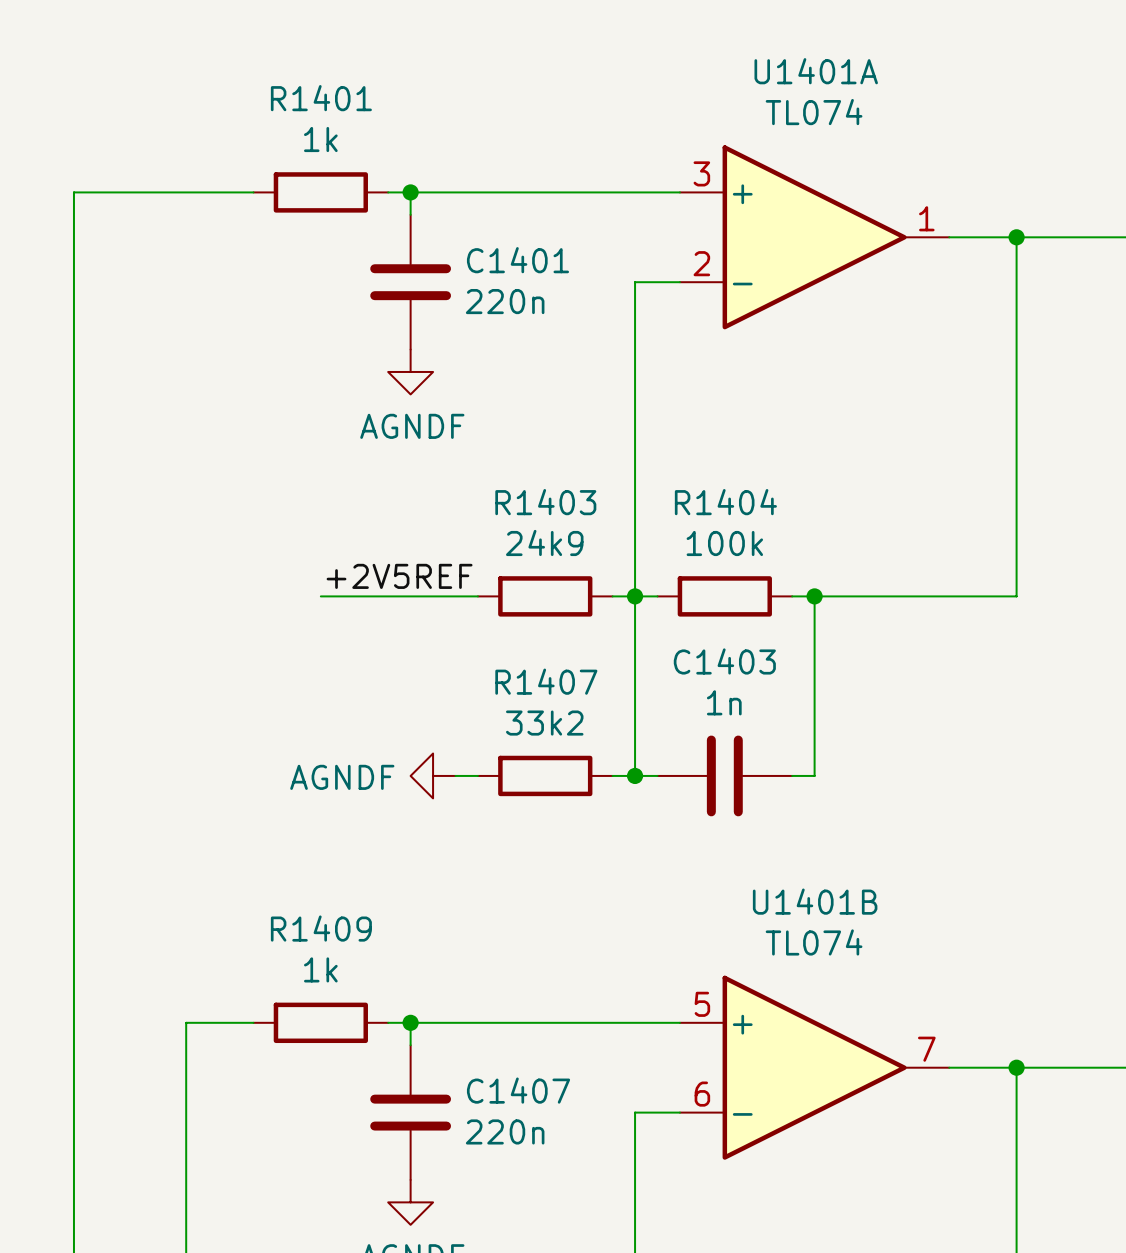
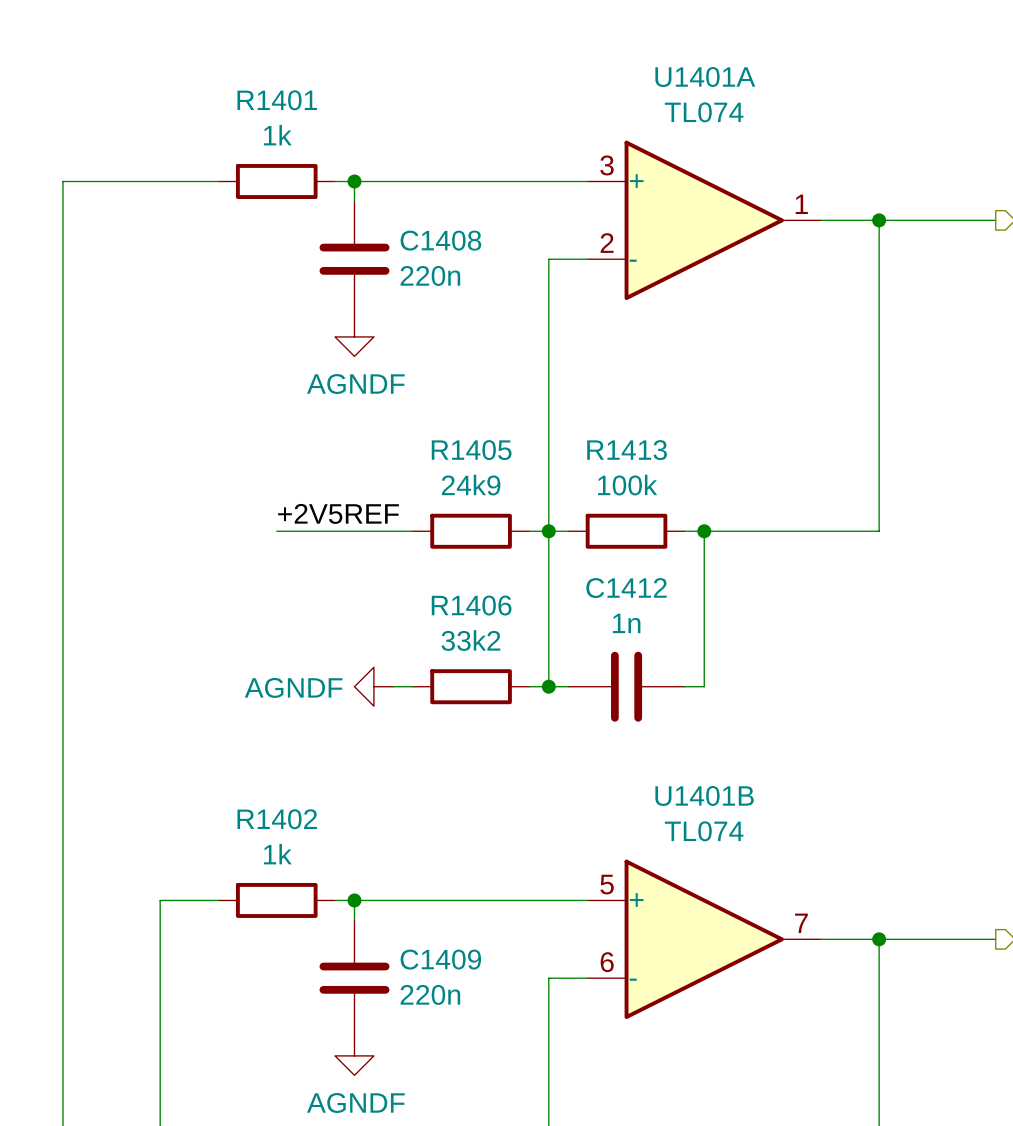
C1401 name: C1401 (517, 260) -> C1408 (440, 240)
R1403 name: R1403 (545, 502) -> R1405 (471, 450)
R1404 name: R1404 (725, 502) -> R1413 (627, 450)
C1403 name: C1403 (724, 661) -> C1412 (626, 588)
R1407 name: R1407 (546, 681) -> R1406 (471, 605)
R1409 name: R1409 (321, 928) -> R1402 (277, 819)
C1407 name: C1407 (518, 1090) -> C1409 (440, 959)

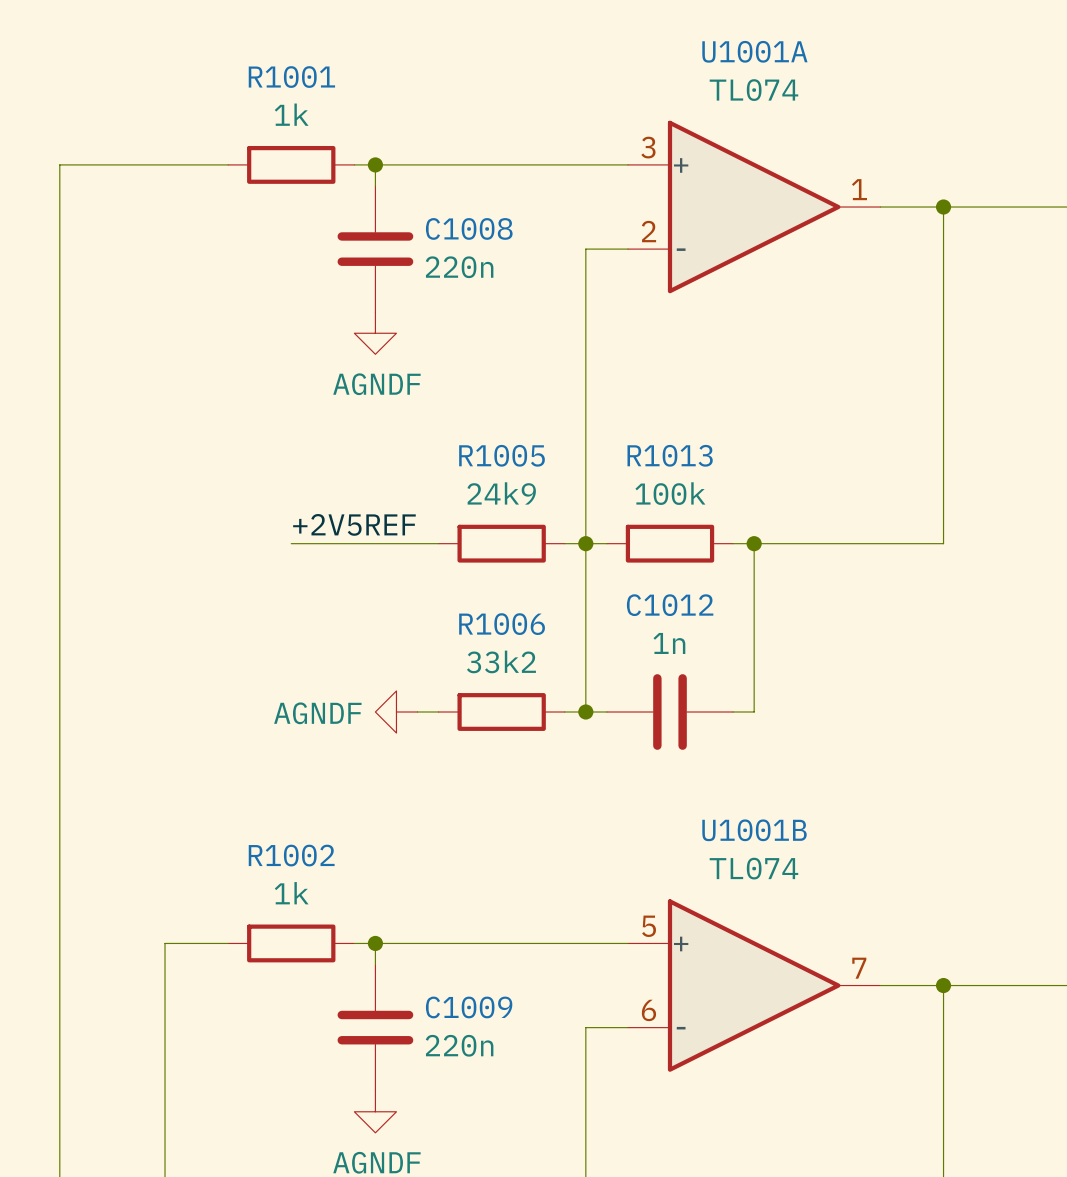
U1401A name: U1401A (705, 77) -> U1001A (754, 51)
R1401 name: R1401 (277, 100) -> R1001 (291, 77)
C1408 name: C1408 (440, 240) -> C1008 (469, 228)
R1405 name: R1405 (471, 450) -> R1005 (502, 455)
R1413 name: R1413 (627, 450) -> R1013 (670, 455)
C1412 name: C1412 (626, 588) -> C1012 (670, 605)
R1406 name: R1406 (471, 605) -> R1006 (502, 624)
U1401B name: U1401B (704, 795) -> U1001B (754, 830)
R1402 name: R1402 (277, 819) -> R1002 (291, 855)
C1409 name: C1409 (440, 959) -> C1009 (469, 1007)

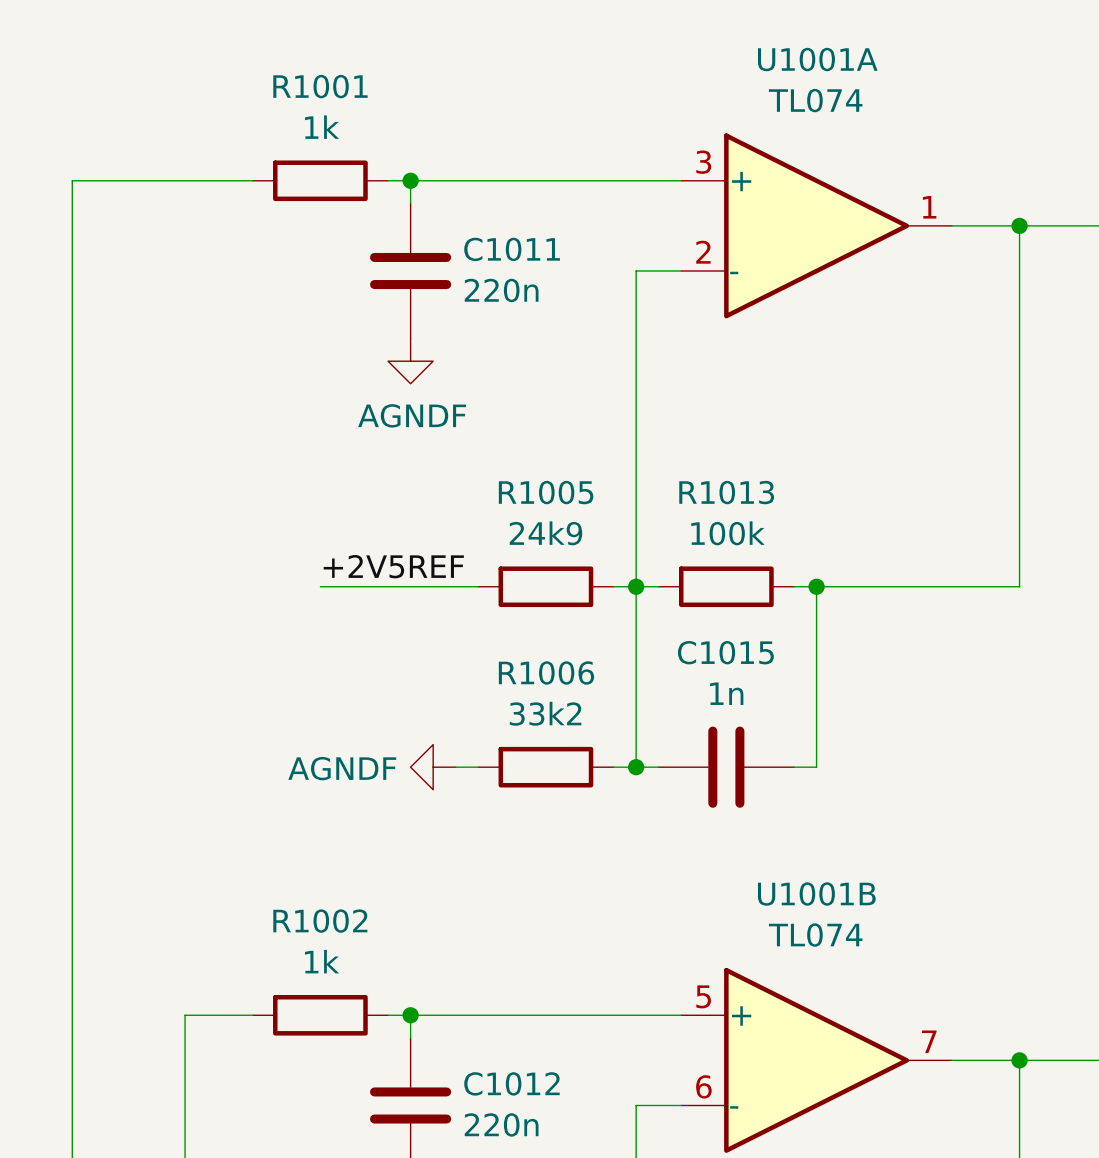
C1008 name: C1008 (469, 228) -> C1011 (512, 249)
C1012 name: C1012 (670, 605) -> C1015 (725, 652)
C1009 name: C1009 (469, 1007) -> C1012 (511, 1083)

